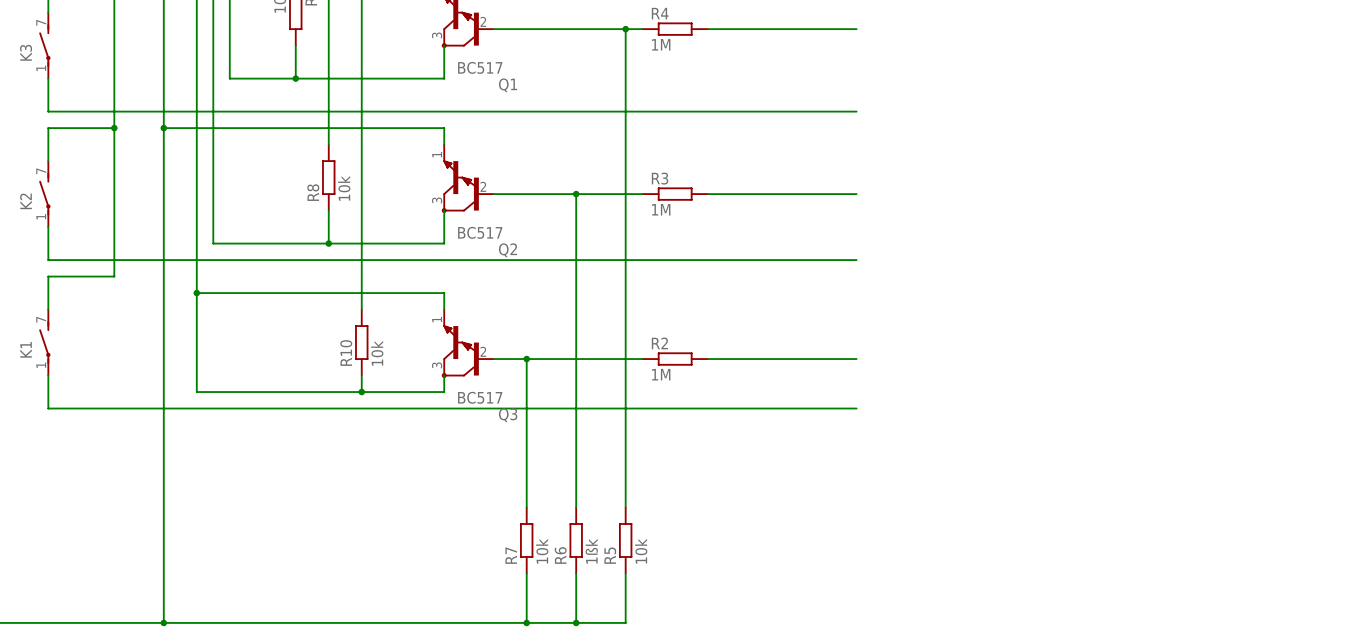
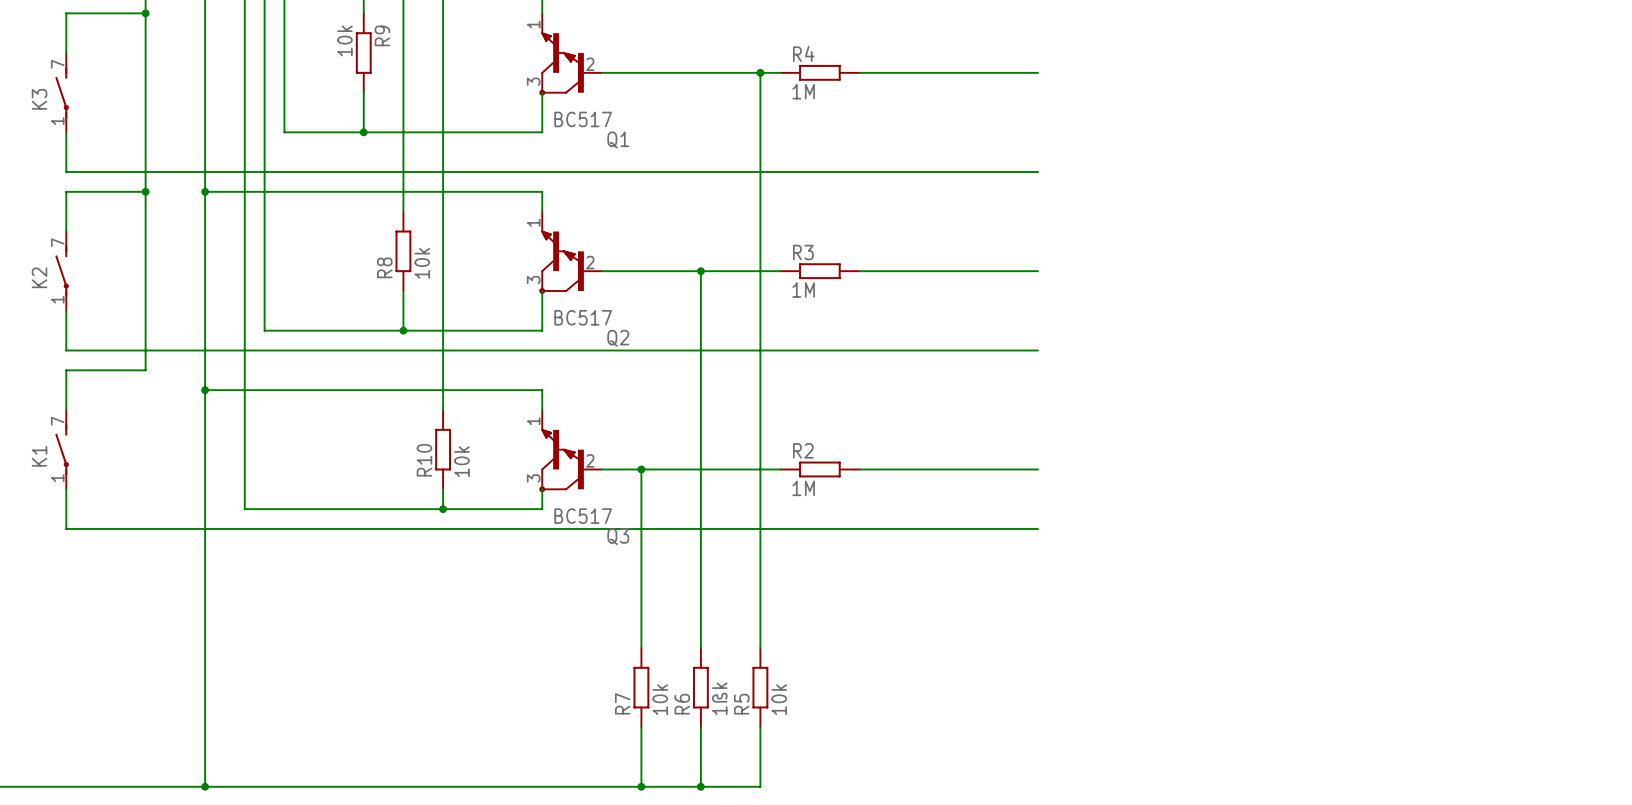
wire: none -> (205, 390) (244, 390)
junction position: (196, 293) -> (205, 390)

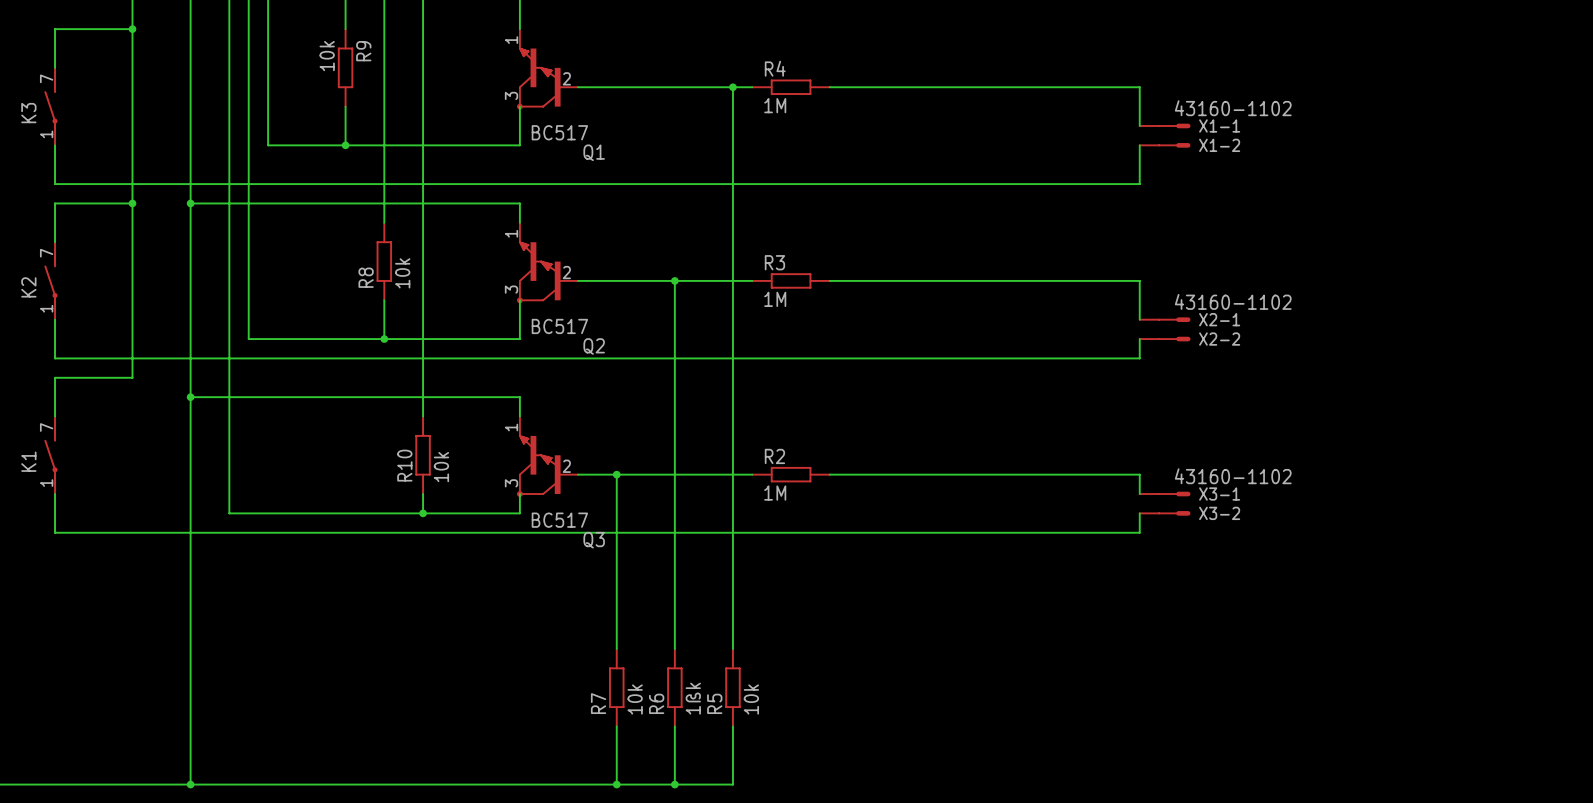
wire: none -> (1004, 87) (1139, 87) (1139, 125)
X1-1: none -> 43160-1102 (1165, 125)
wire: none -> (1139, 145) (1139, 184) (1004, 184)
X1-2: none -> (1165, 145)
wire: none -> (1004, 280) (1139, 280) (1139, 319)
X2-1: none -> 43160-1102 (1165, 319)
wire: none -> (1139, 339) (1139, 358) (1004, 358)
X2-2: none -> (1165, 339)
wire: none -> (1004, 474) (1139, 474) (1139, 494)
X3-1: none -> 43160-1102 (1165, 494)
wire: none -> (1139, 513) (1139, 532) (1004, 532)
X3-2: none -> (1165, 513)

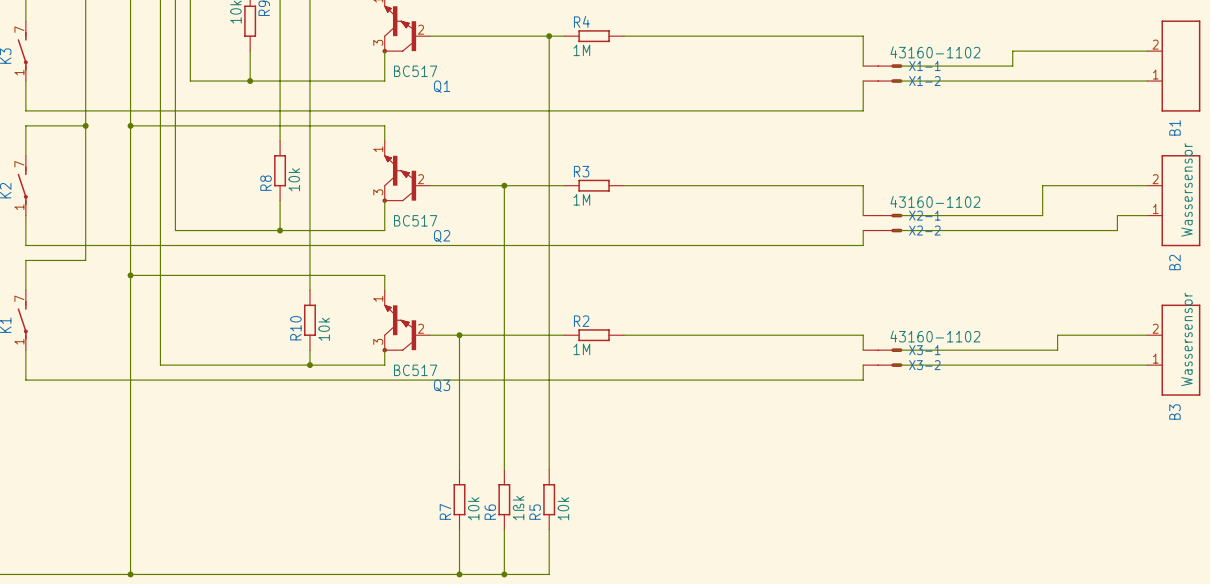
wire: none -> (1147, 51) (1012, 51) (1012, 66) (893, 66)
B1: none -> (1173, 66)
wire: none -> (893, 81) (1147, 81)
wire: none -> (1147, 185) (1042, 185) (1042, 215) (893, 215)
B2: none -> (1173, 200)
wire: none -> (1147, 215) (1117, 215) (1117, 230) (893, 230)
wire: none -> (1147, 335) (1057, 335) (1057, 350) (893, 350)
B3: none -> (1173, 350)
wire: none -> (893, 365) (1147, 365)

